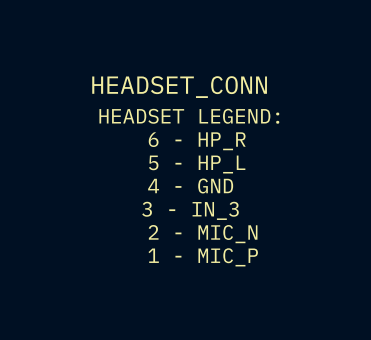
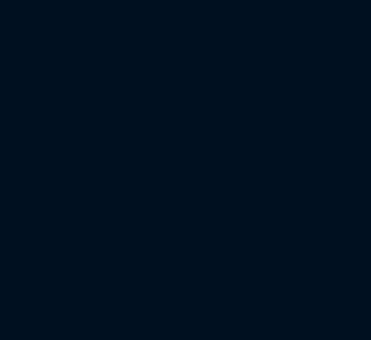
text: HEADSET_CONN (179, 87) -> none
text: HEADSET LEGEND: (189, 116) -> none
text: 6 - HP_R (197, 141) -> none
text: 5 - HP_L (197, 164) -> none
text: 4 - GND (190, 186) -> none
text: 3 - IN_3 (190, 210) -> none
text: 2 - MIC_N (203, 234) -> none
text: 1 - MIC_P (203, 257) -> none

